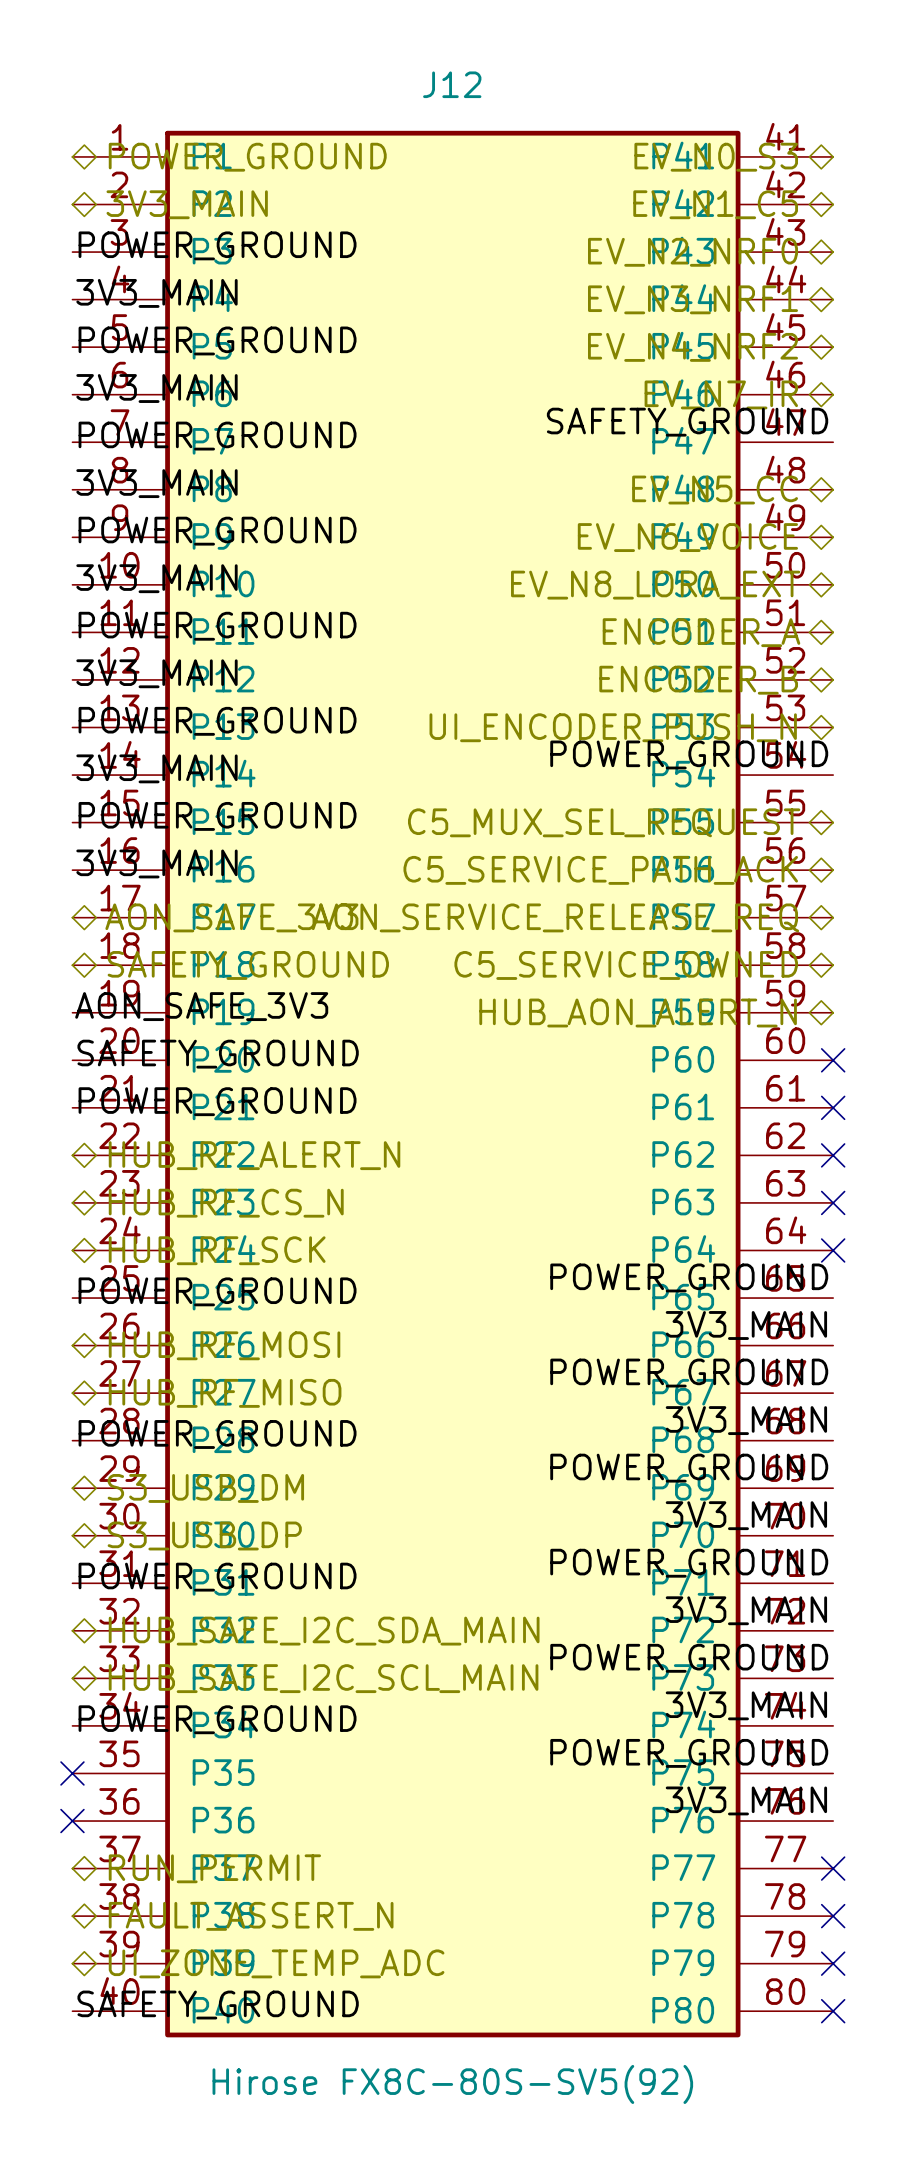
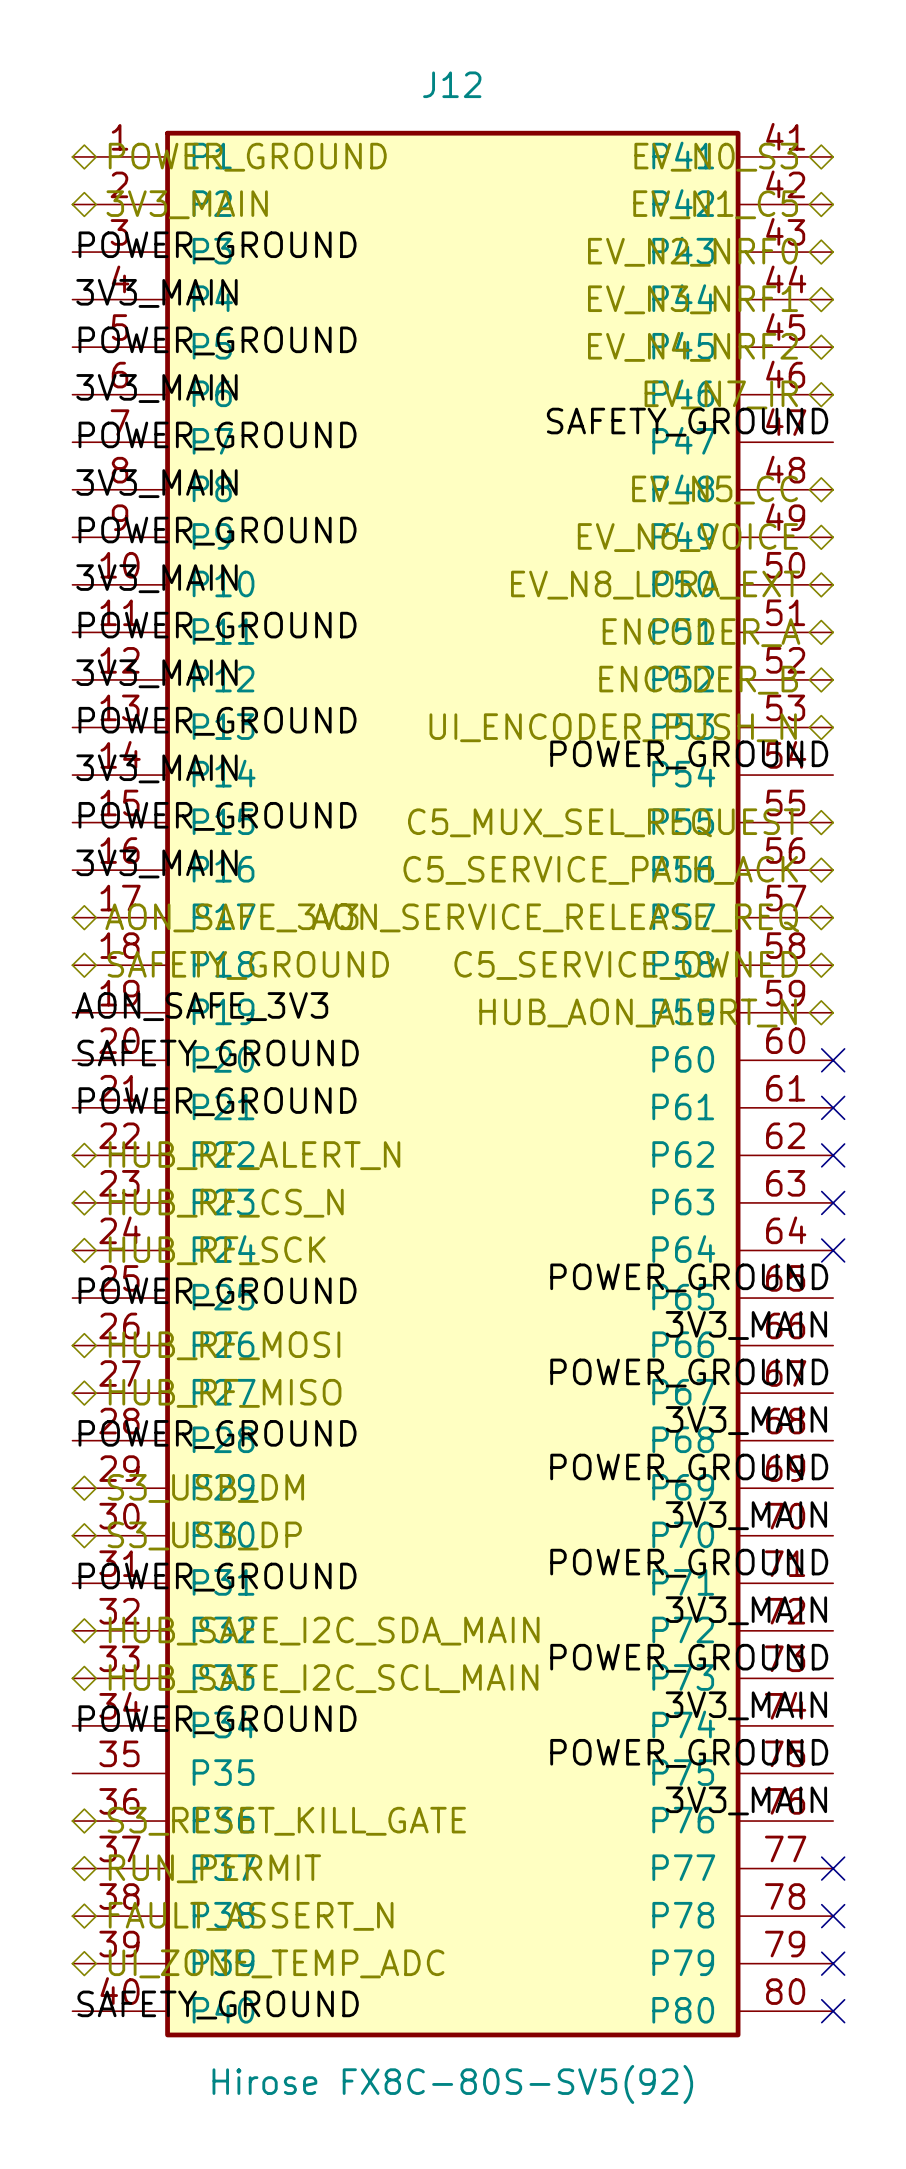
no-connect mark: (72, 1773) -> none
no-connect mark: (72, 1821) -> none
hierarchical label: none -> S3_RESET_KILL_GATE (286, 1821)

